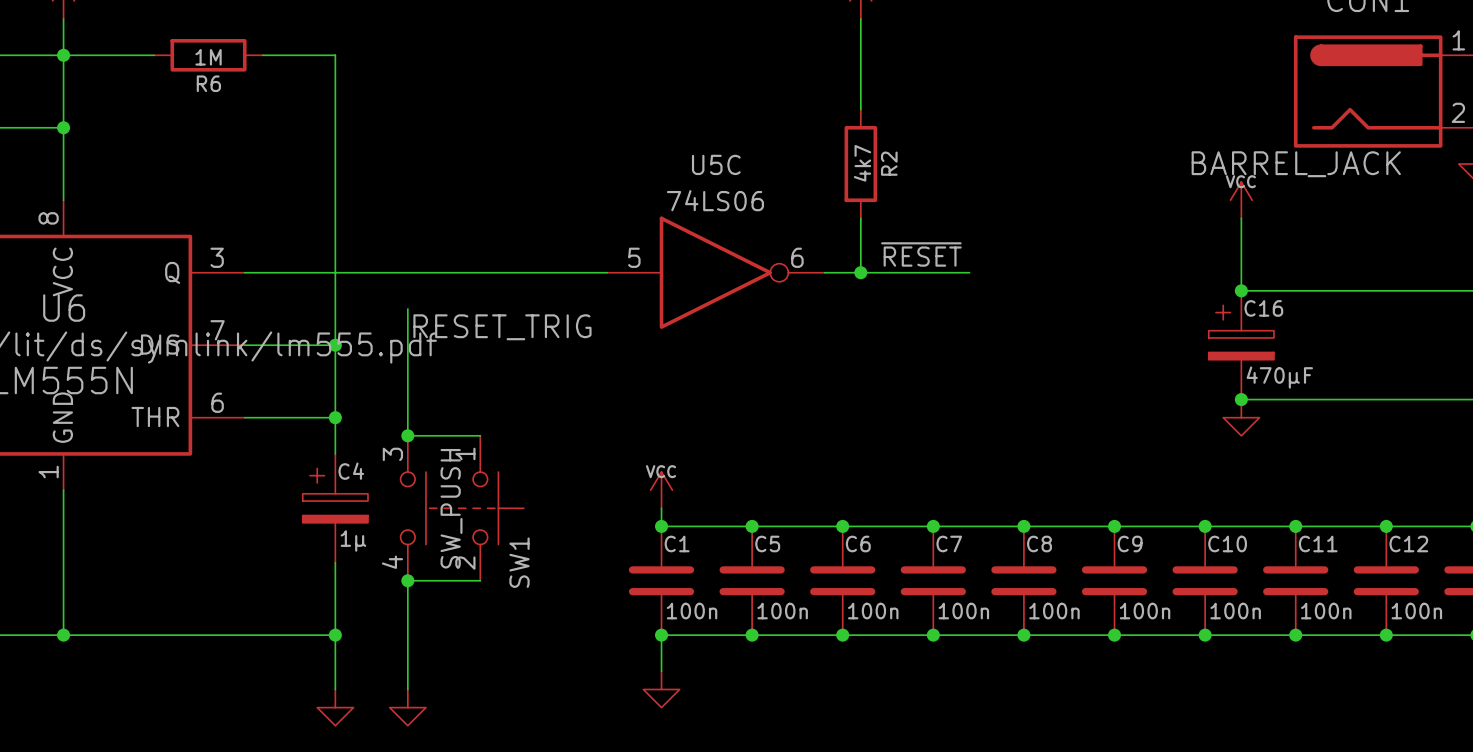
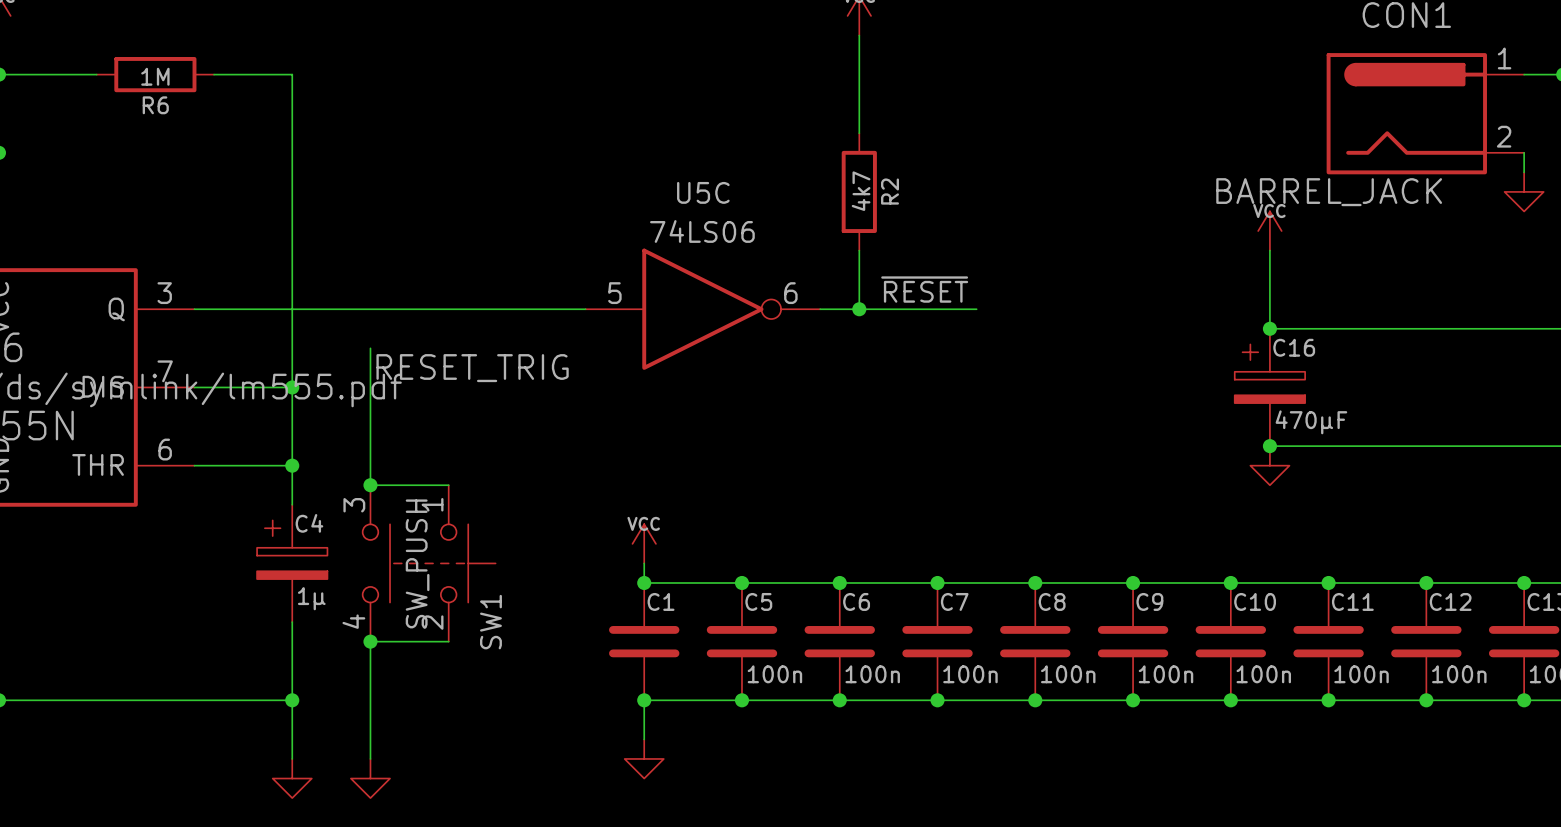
C1 value: 100n (692, 611) -> none

